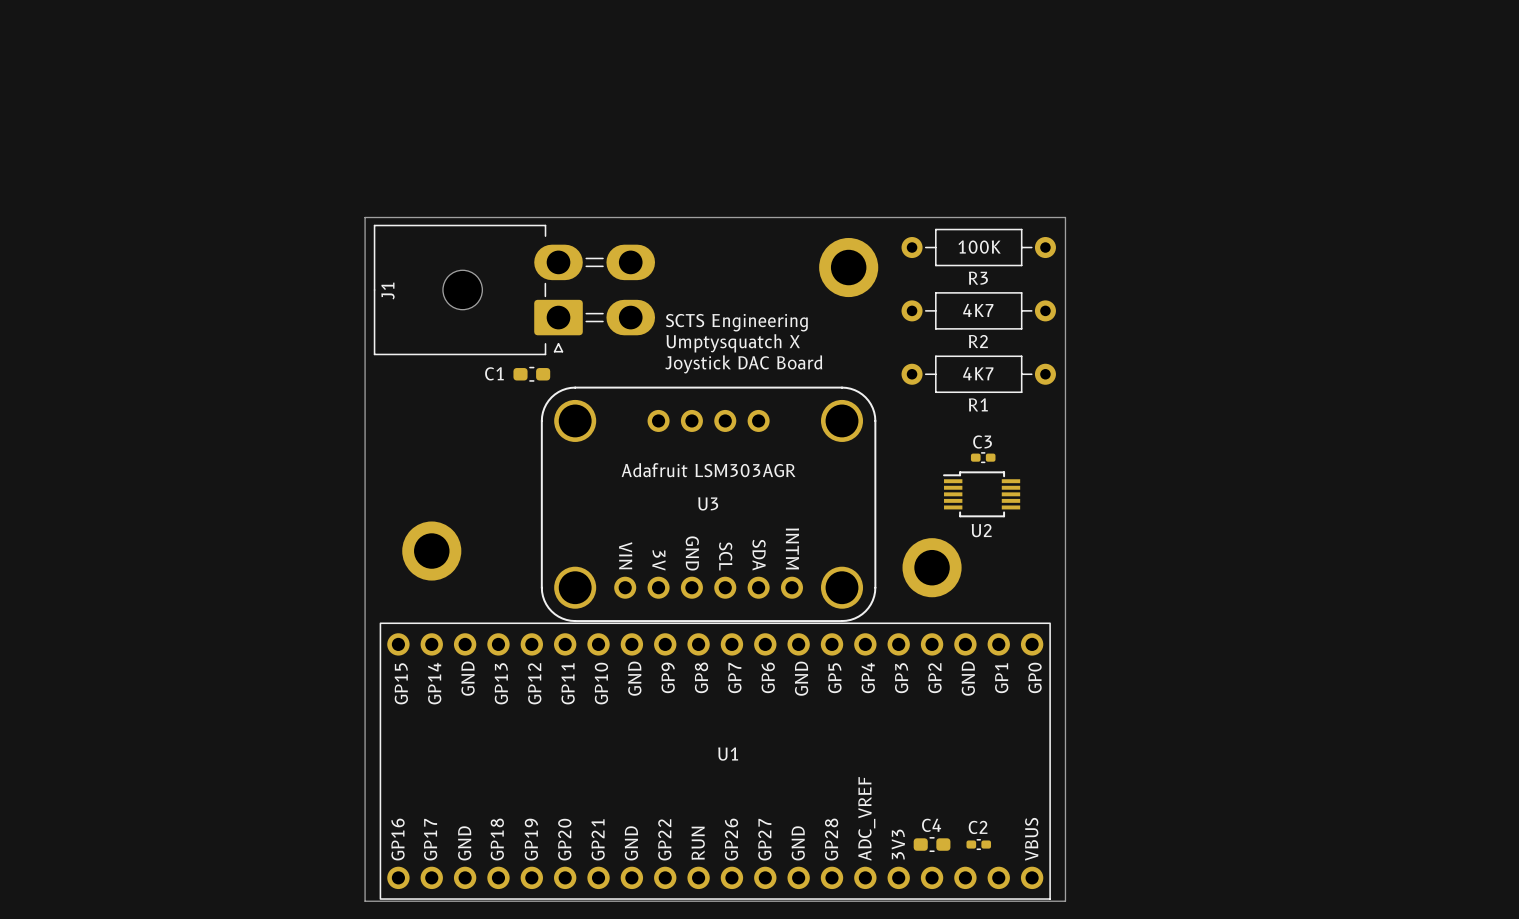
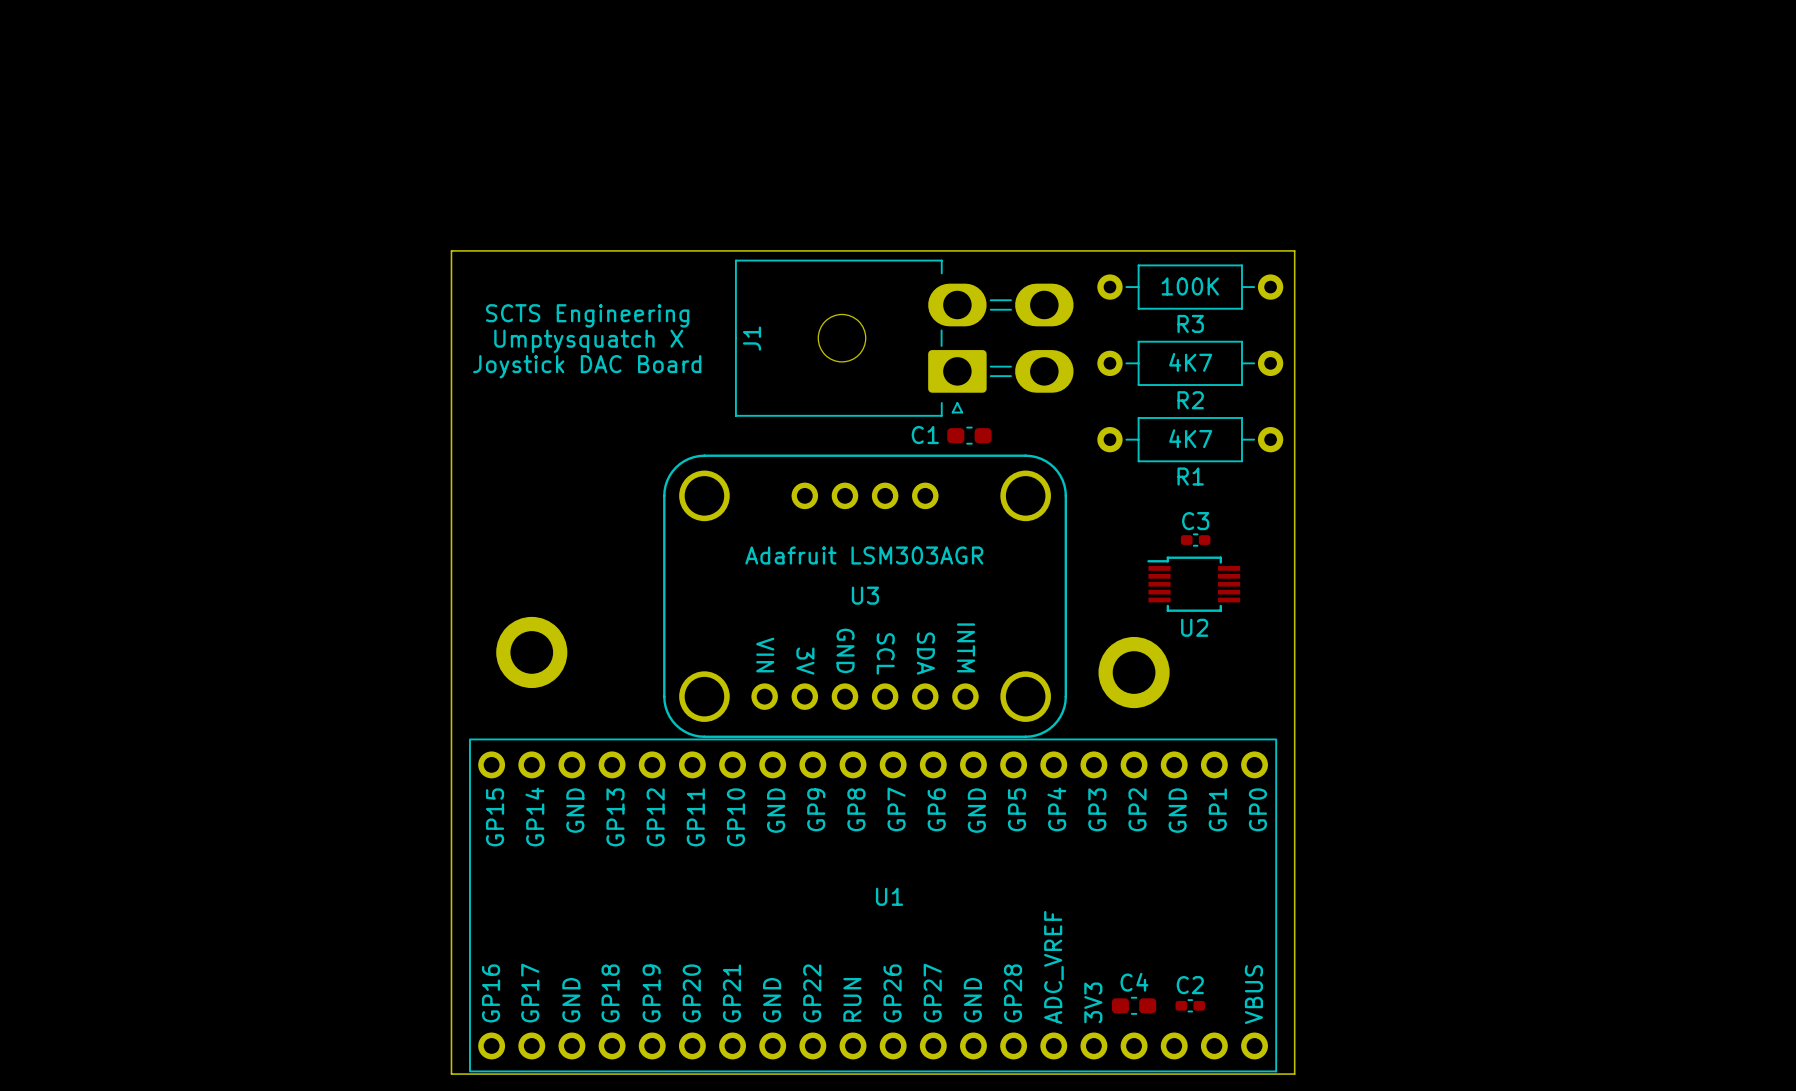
part: (848, 267) -> none
J1 position: (514, 289) -> (904, 338)
text position: SCTS Engineering (736, 322) -> SCTS Engineering (587, 315)
text position: Umptysquatch X (733, 343) -> Umptysquatch X (588, 341)
text position: Joystick DAC Board (743, 364) -> Joystick DAC Board (587, 366)
C1 position: (531, 374) -> (969, 435)

